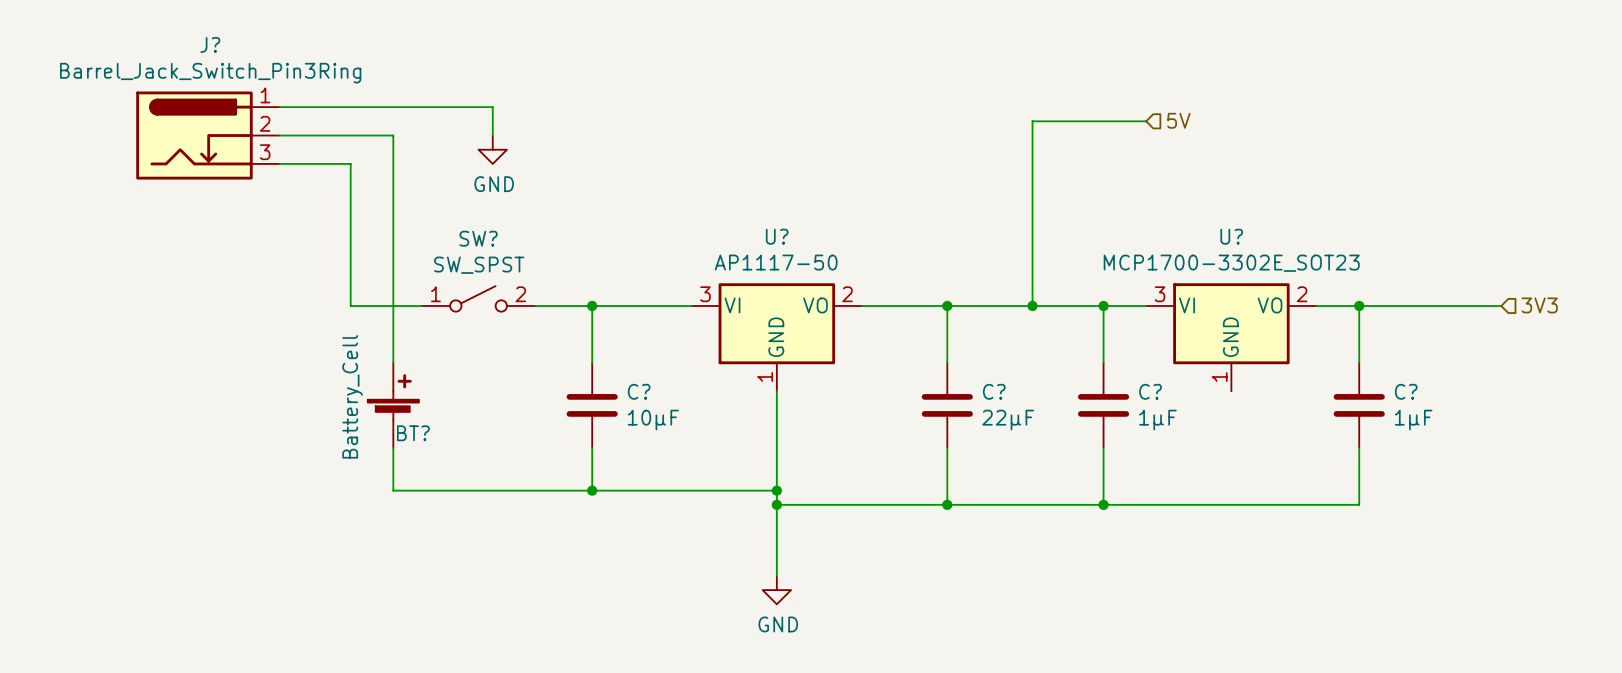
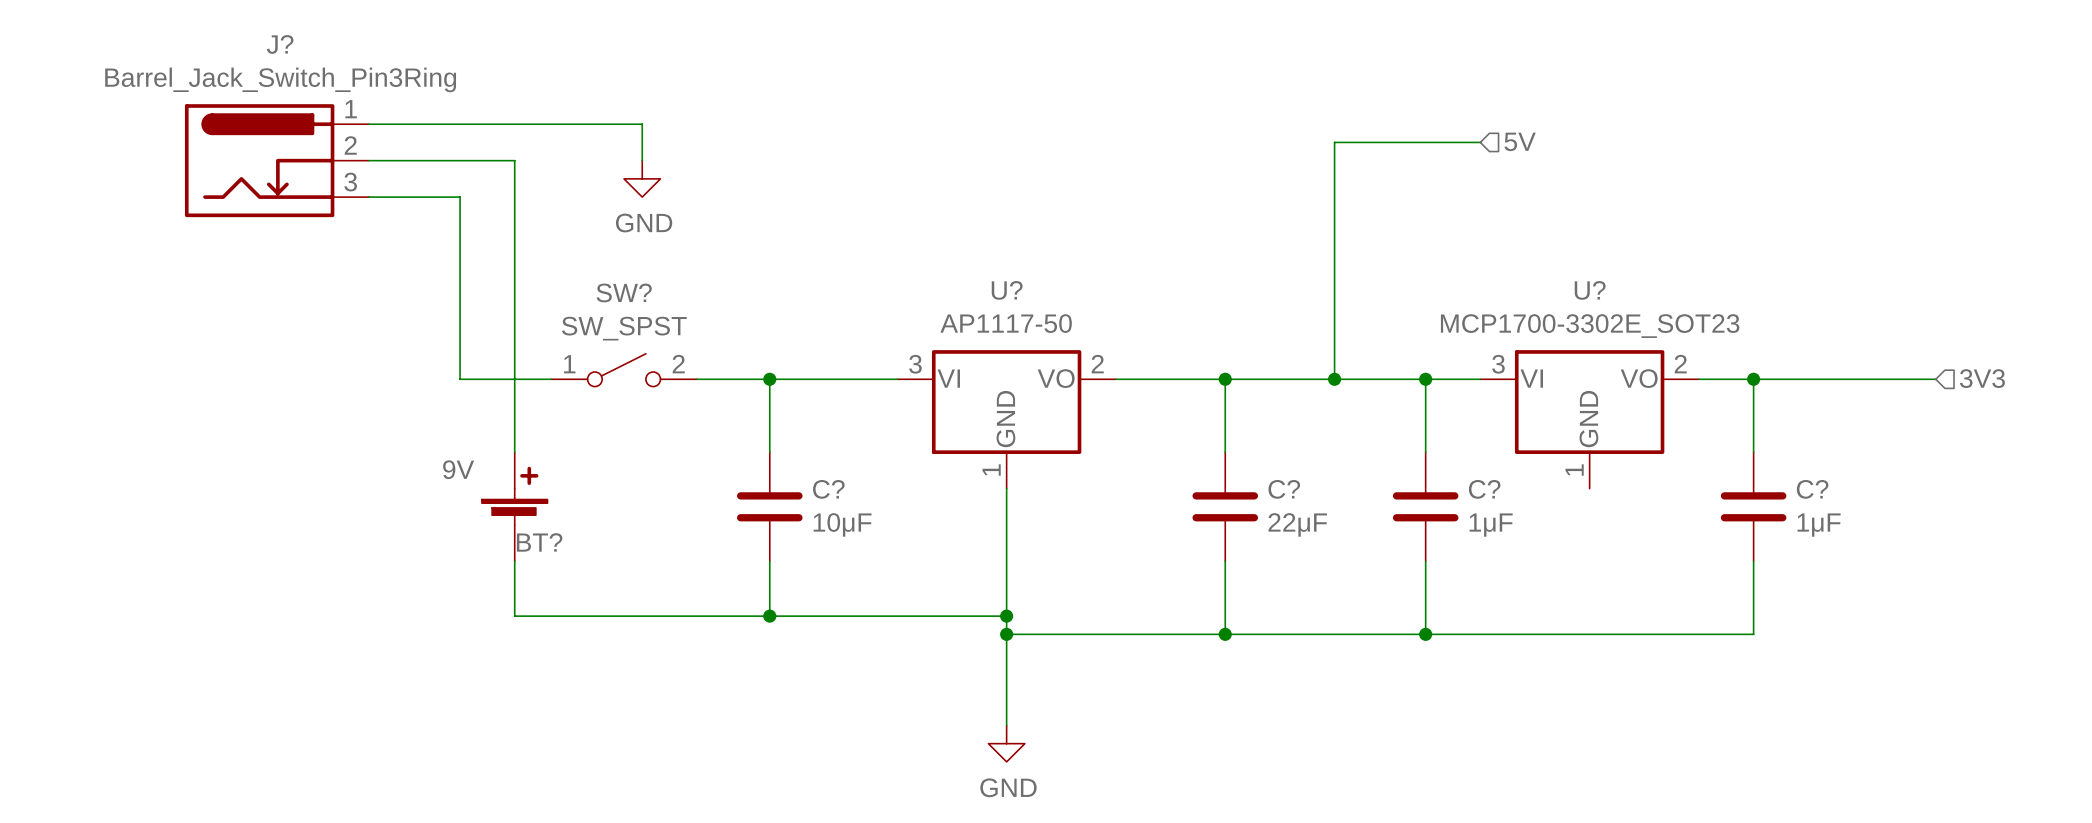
BT? value: Battery_Cell (352, 396) -> 9V (458, 469)

